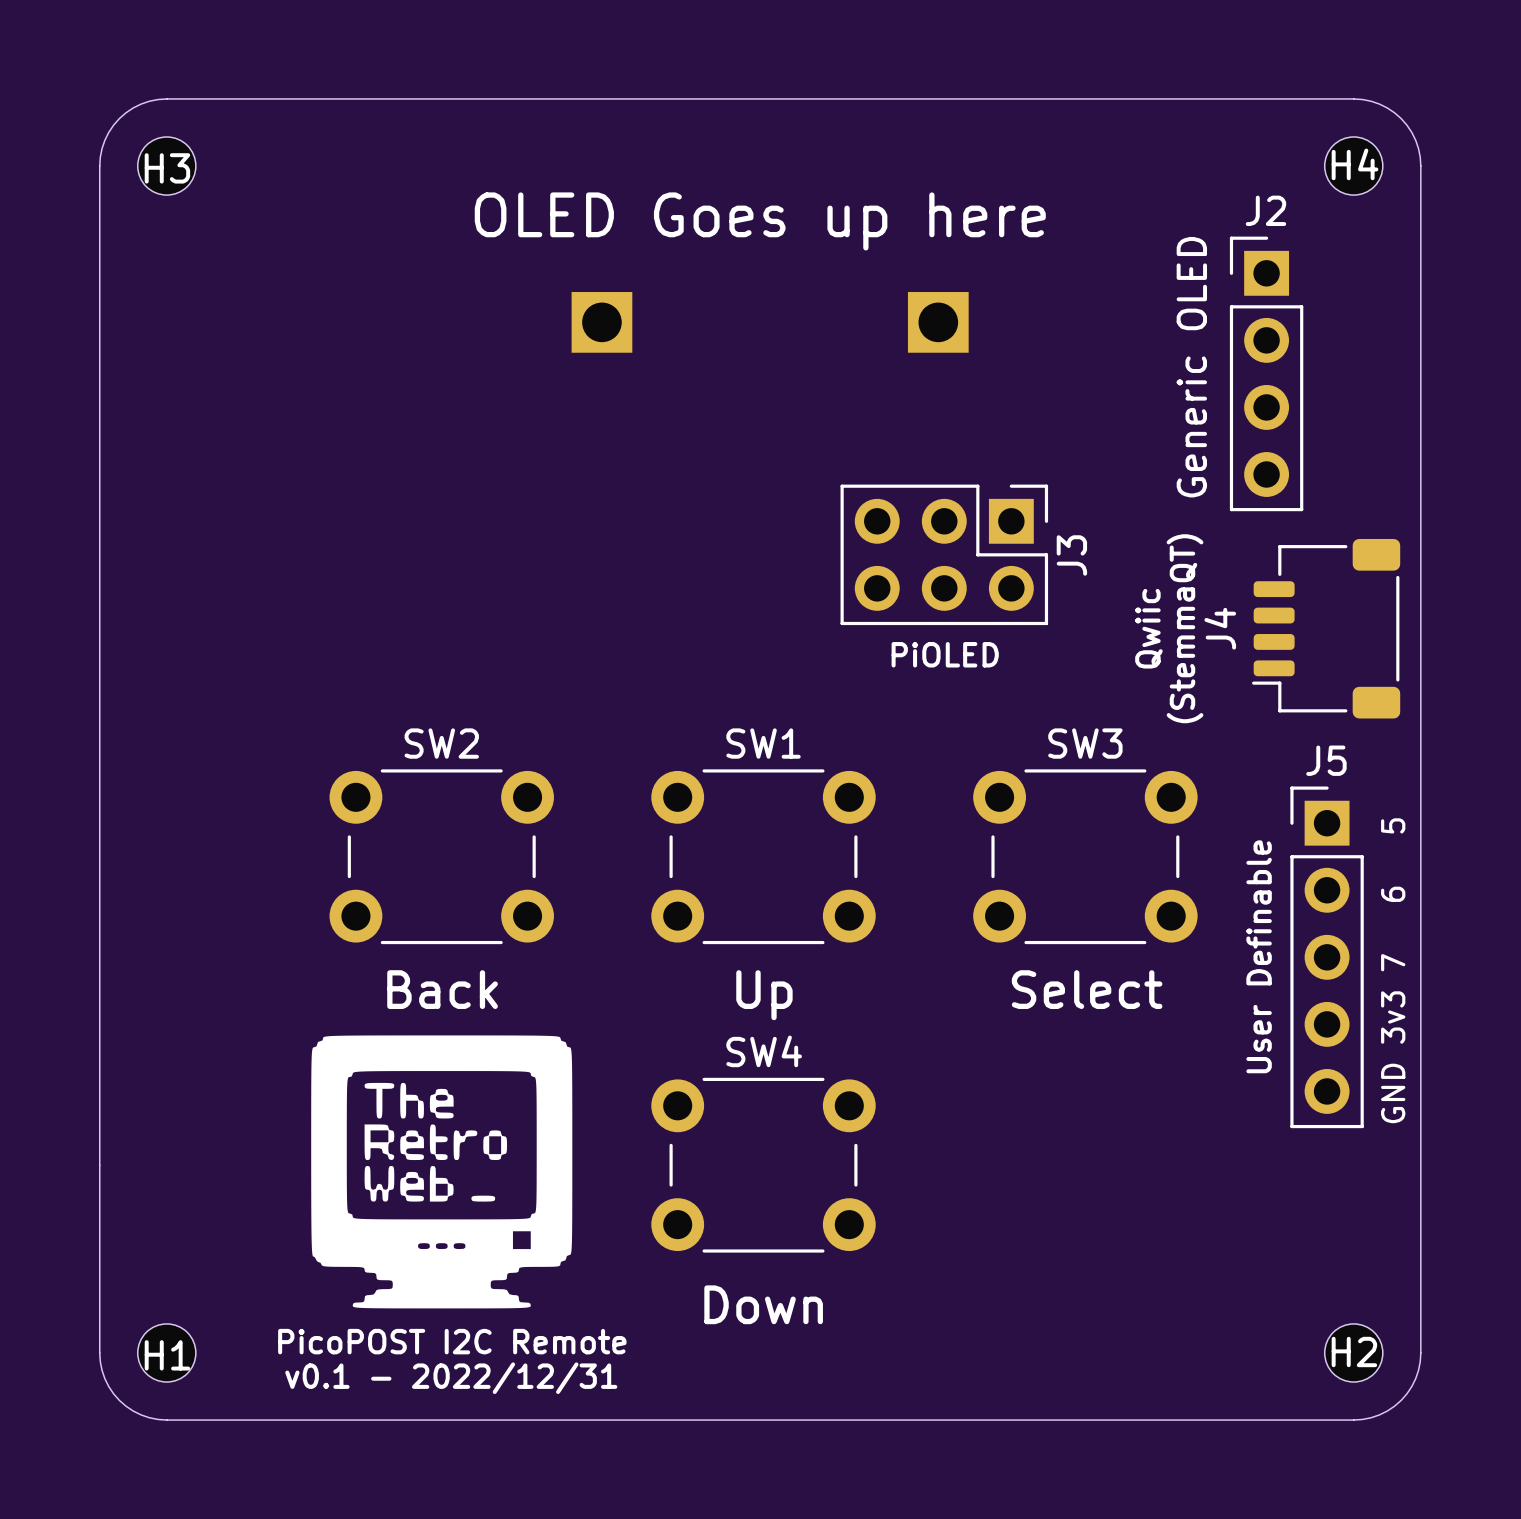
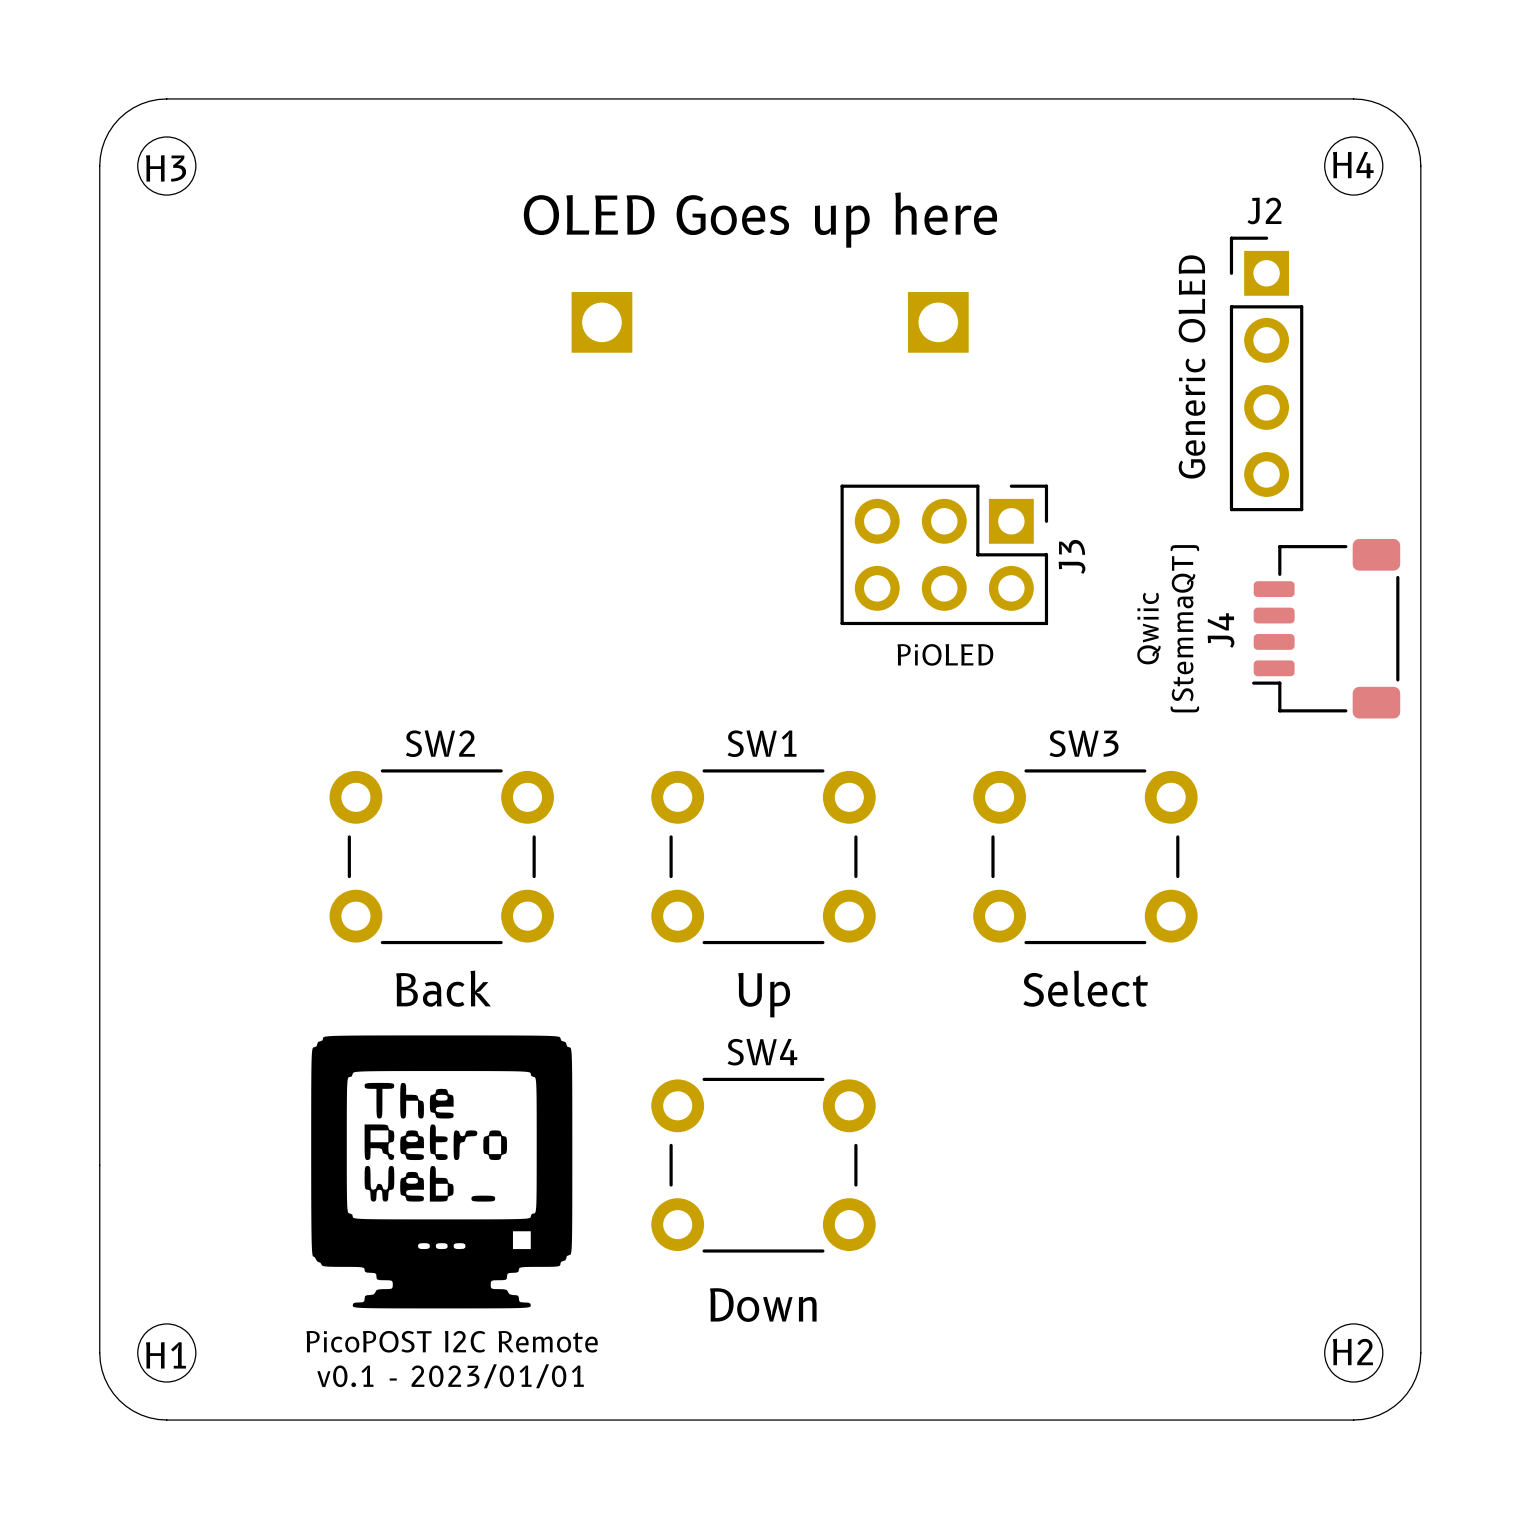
text: User Definable (1259, 956) -> none
J5: (1327, 957) -> none
text: GND 3v3 7 6 5 (1393, 970) -> none
text: v0.1 - 2022/12/31 (451, 1378) -> v0.1 - 2023/01/01 (450, 1376)

